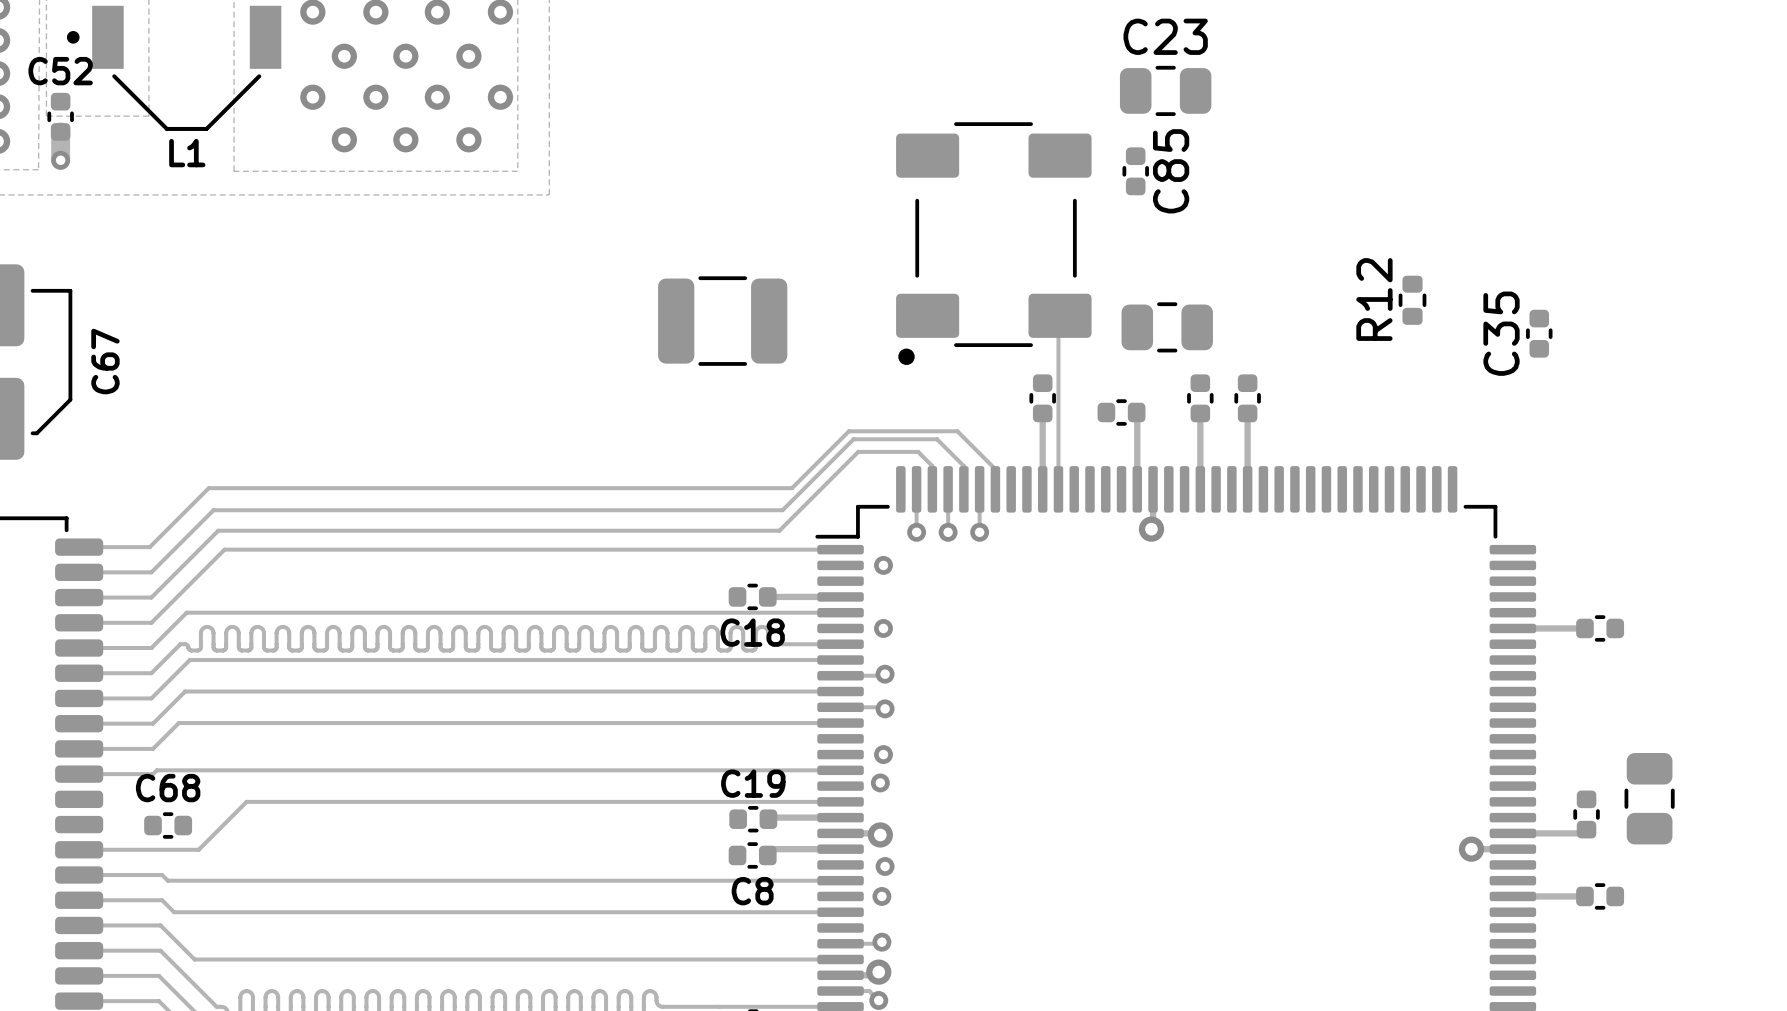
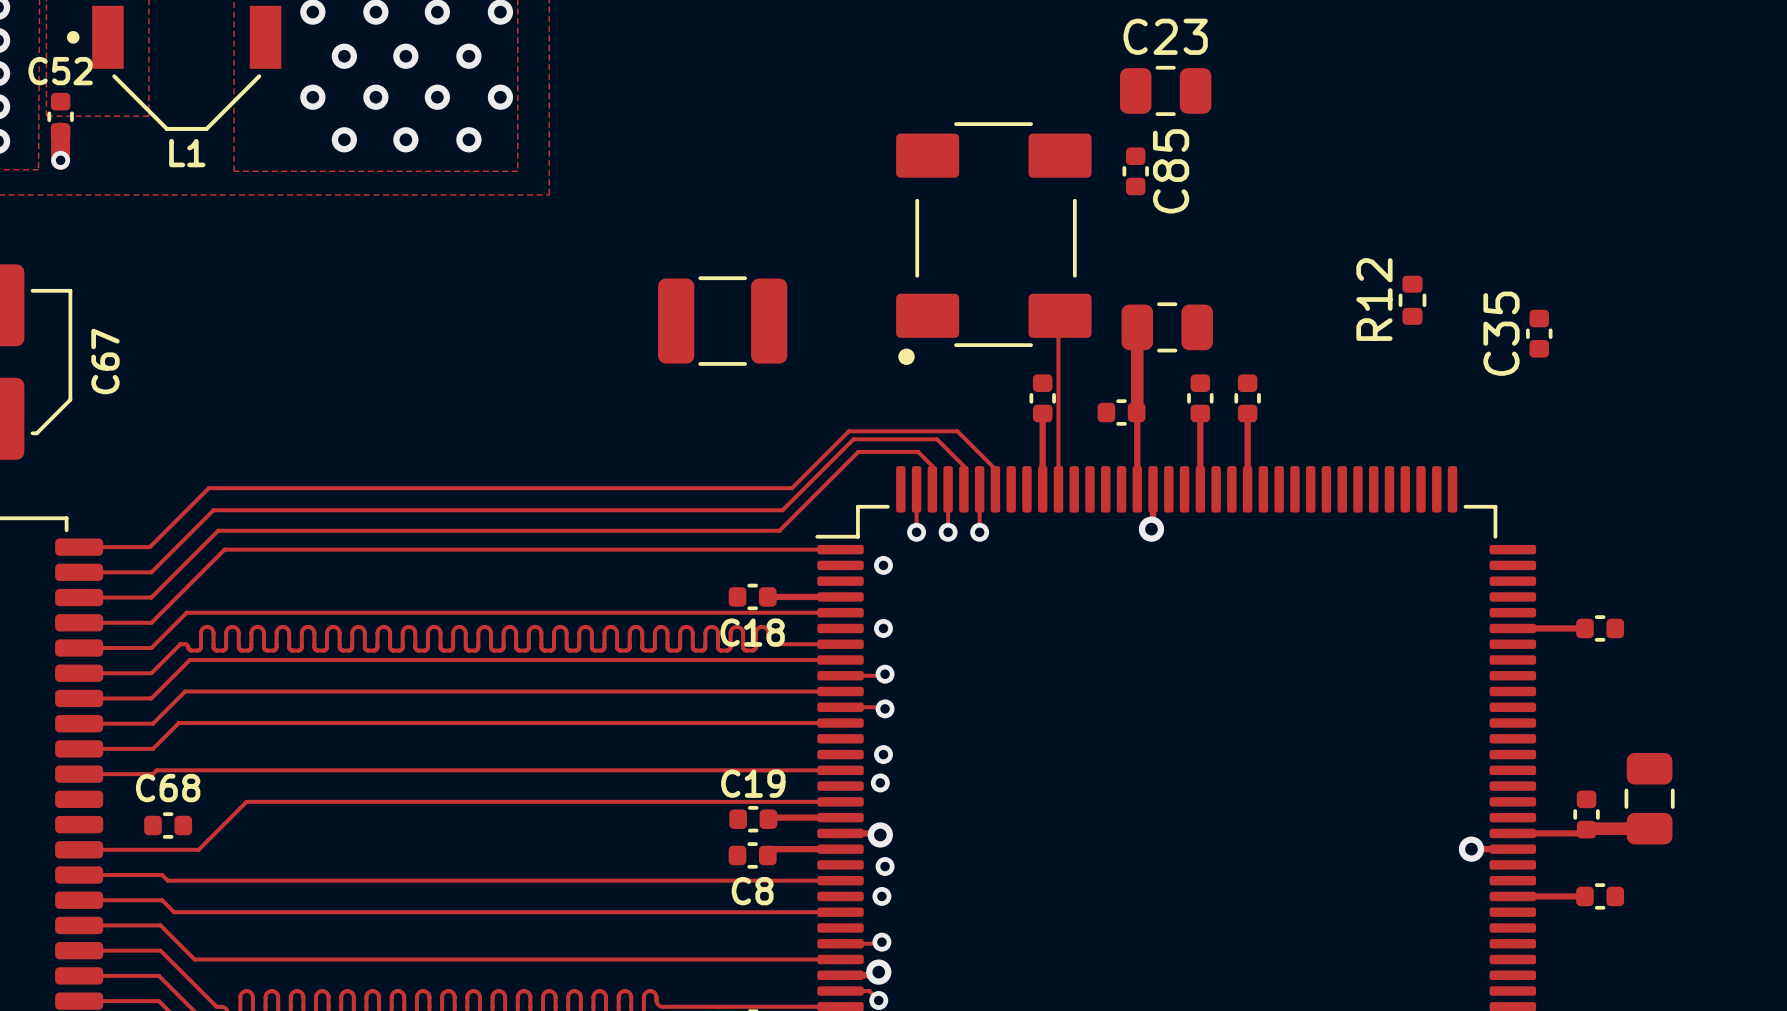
track: none -> (1137, 327) (1136, 412)
track: none -> (1649, 828) (1586, 829)

